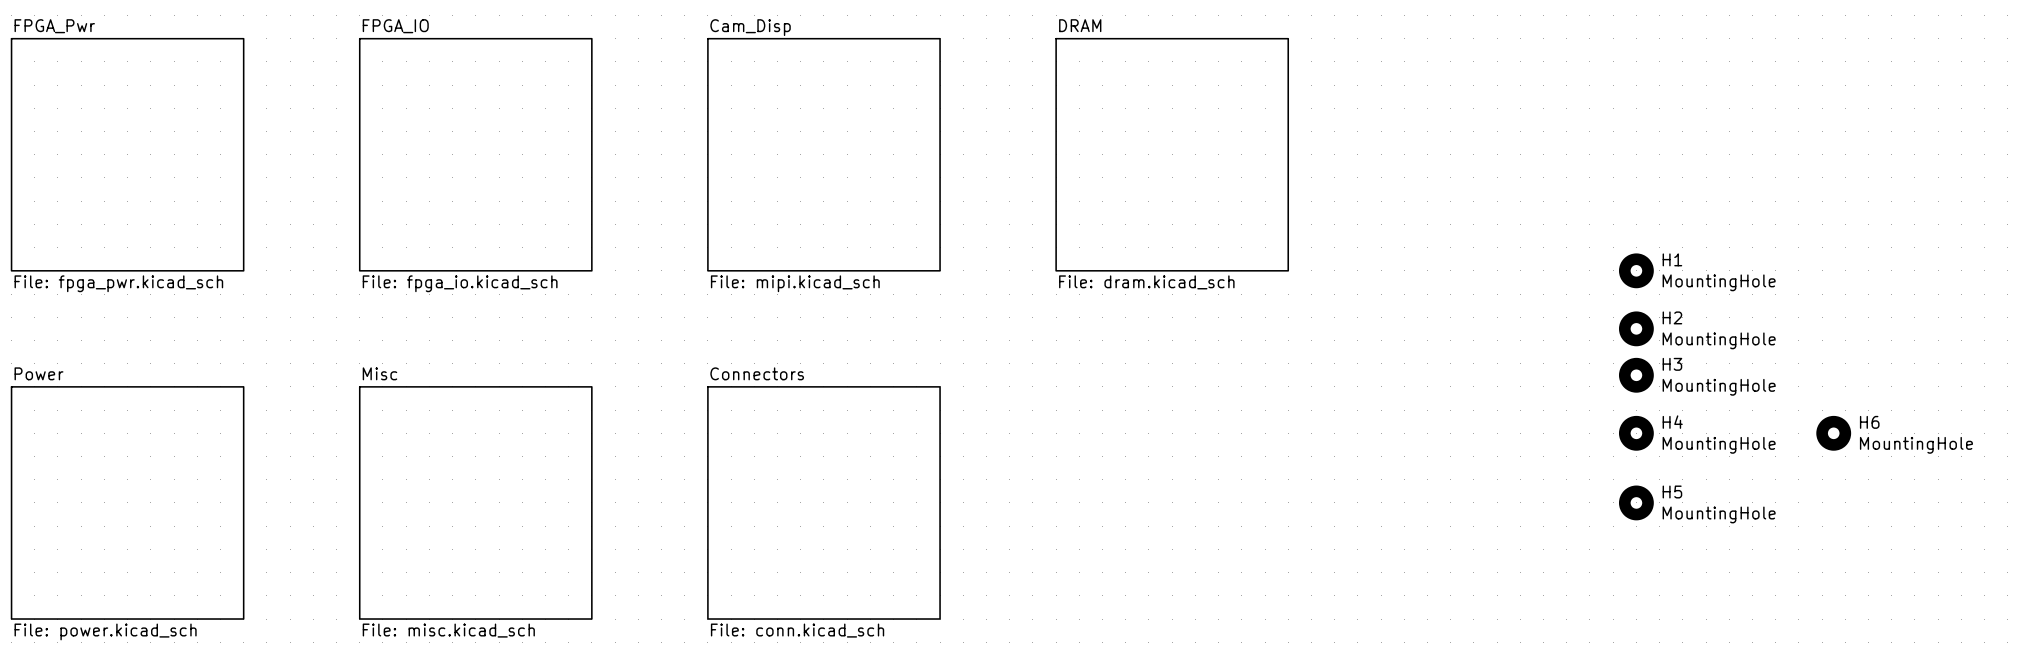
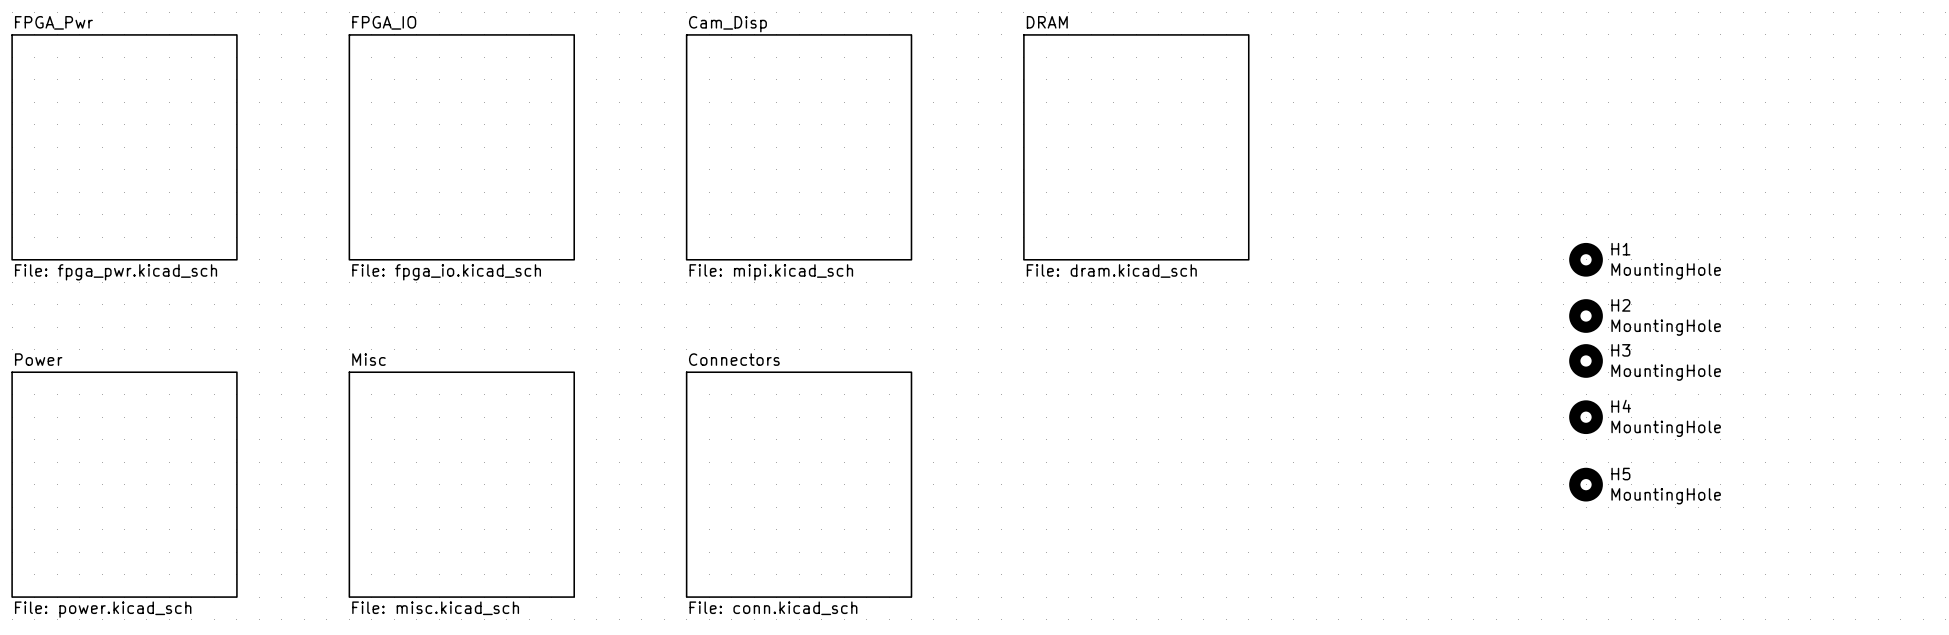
H6: MountingHole (1833, 433) -> none

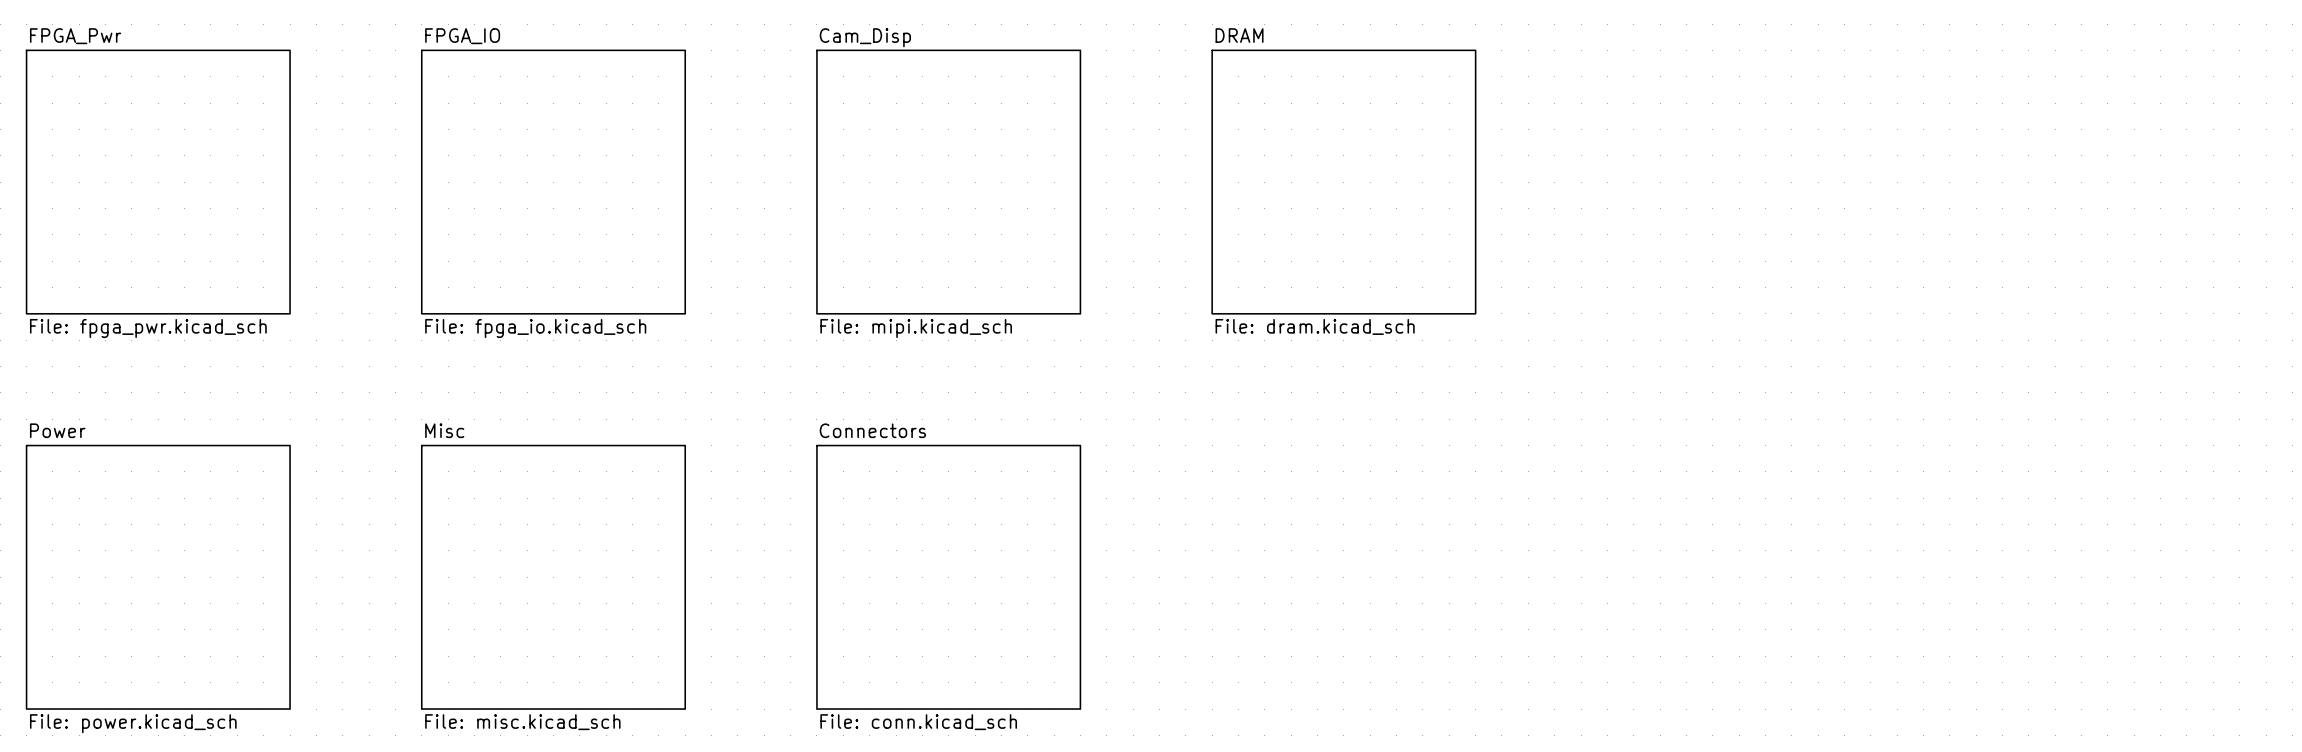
H1: MountingHole (1586, 259) -> none
H2: MountingHole (1586, 316) -> none
H3: MountingHole (1586, 360) -> none
H4: MountingHole (1586, 417) -> none
H5: MountingHole (1586, 484) -> none

